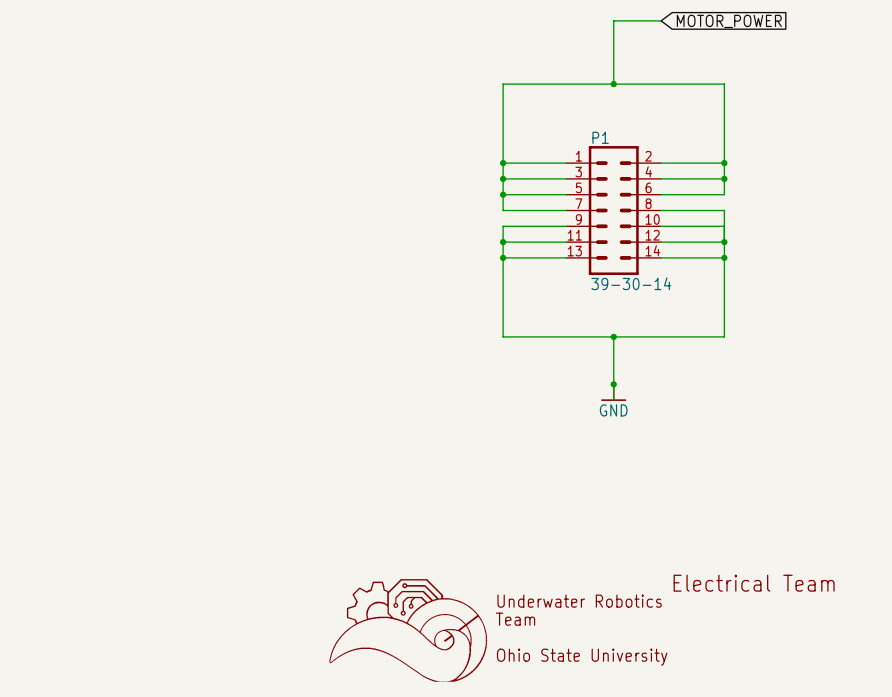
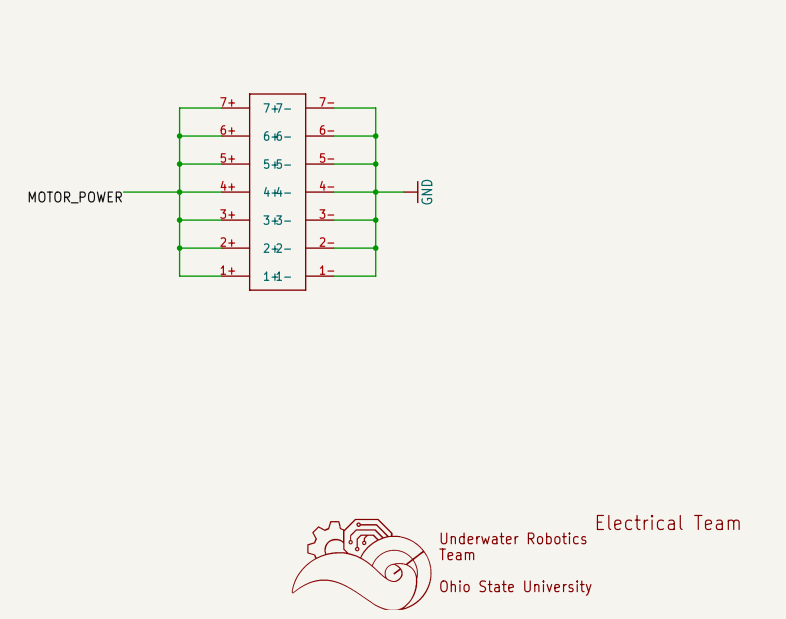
wire: (661, 20) (613, 20) (613, 84) -> none
global label: MOTOR_POWER (729, 21) -> none
junction: (613, 84) -> none
wire: none -> (221, 108) (179, 108) (179, 276) (221, 276)
wire: none -> (333, 108) (375, 108) (375, 276) (333, 276)
wire: none -> (179, 136) (221, 136)
junction: none -> (179, 136)
wire: none -> (333, 136) (375, 136)
junction: none -> (375, 136)
wire: (503, 163) (566, 163) -> none
junction: (503, 163) -> none
wire: (661, 163) (724, 163) -> none
junction: (724, 163) -> none
wire: none -> (179, 164) (221, 164)
junction: none -> (179, 164)
wire: none -> (333, 164) (375, 164)
junction: none -> (375, 164)
wire: (503, 178) (566, 178) -> none
junction: (503, 178) -> none
wire: (661, 178) (724, 178) -> none
junction: (724, 178) -> none
wire: (503, 194) (566, 194) -> none
junction: (503, 194) -> none
wire: (661, 194) (724, 194) (724, 84) (503, 84) (503, 210) (566, 210) -> none
wire: none -> (123, 192) (221, 192)
junction: none -> (179, 192)
part: none -> (277, 192)
wire: none -> (333, 192) (403, 192)
junction: none -> (375, 192)
power symbol: none -> GND (411, 192)
P1: 39-30-14 (613, 210) -> none
wire: (661, 210) (724, 210) (724, 336) (503, 336) (503, 226) (566, 226) -> none
label: none -> MOTOR_POWER (75, 197)
wire: (661, 226) (724, 226) -> none
wire: none -> (179, 220) (221, 220)
junction: none -> (179, 220)
wire: none -> (333, 220) (375, 220)
junction: none -> (375, 220)
wire: (503, 242) (566, 242) -> none
junction: (503, 242) -> none
wire: (661, 242) (724, 242) -> none
junction: (724, 242) -> none
wire: (503, 257) (566, 257) -> none
junction: (503, 257) -> none
wire: (661, 257) (724, 257) -> none
junction: (724, 257) -> none
wire: none -> (179, 248) (221, 248)
junction: none -> (179, 248)
wire: none -> (333, 248) (375, 248)
junction: none -> (375, 248)
wire: (613, 336) (613, 400) -> none
junction: (613, 336) -> none
junction: (613, 384) -> none
power symbol: GND (613, 392) -> none

